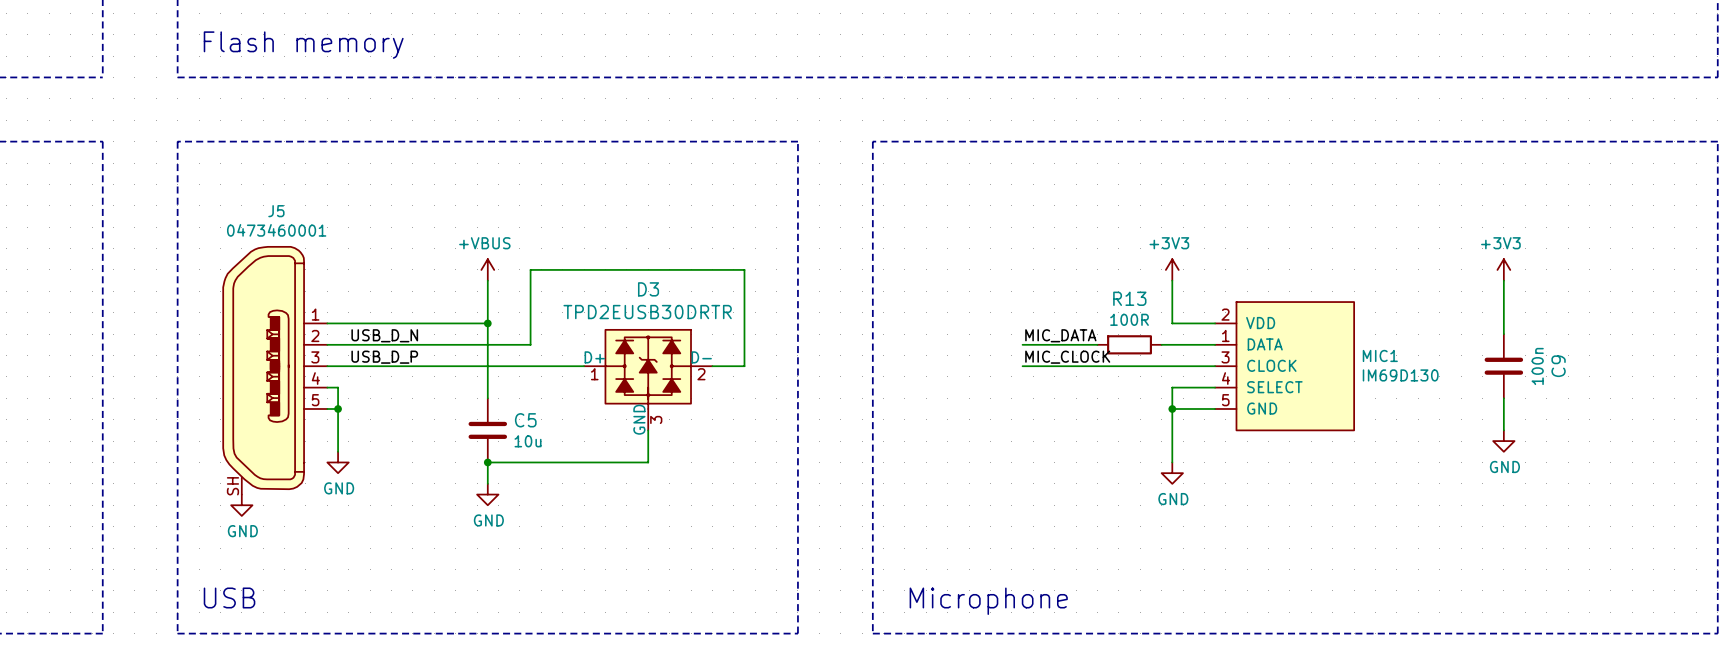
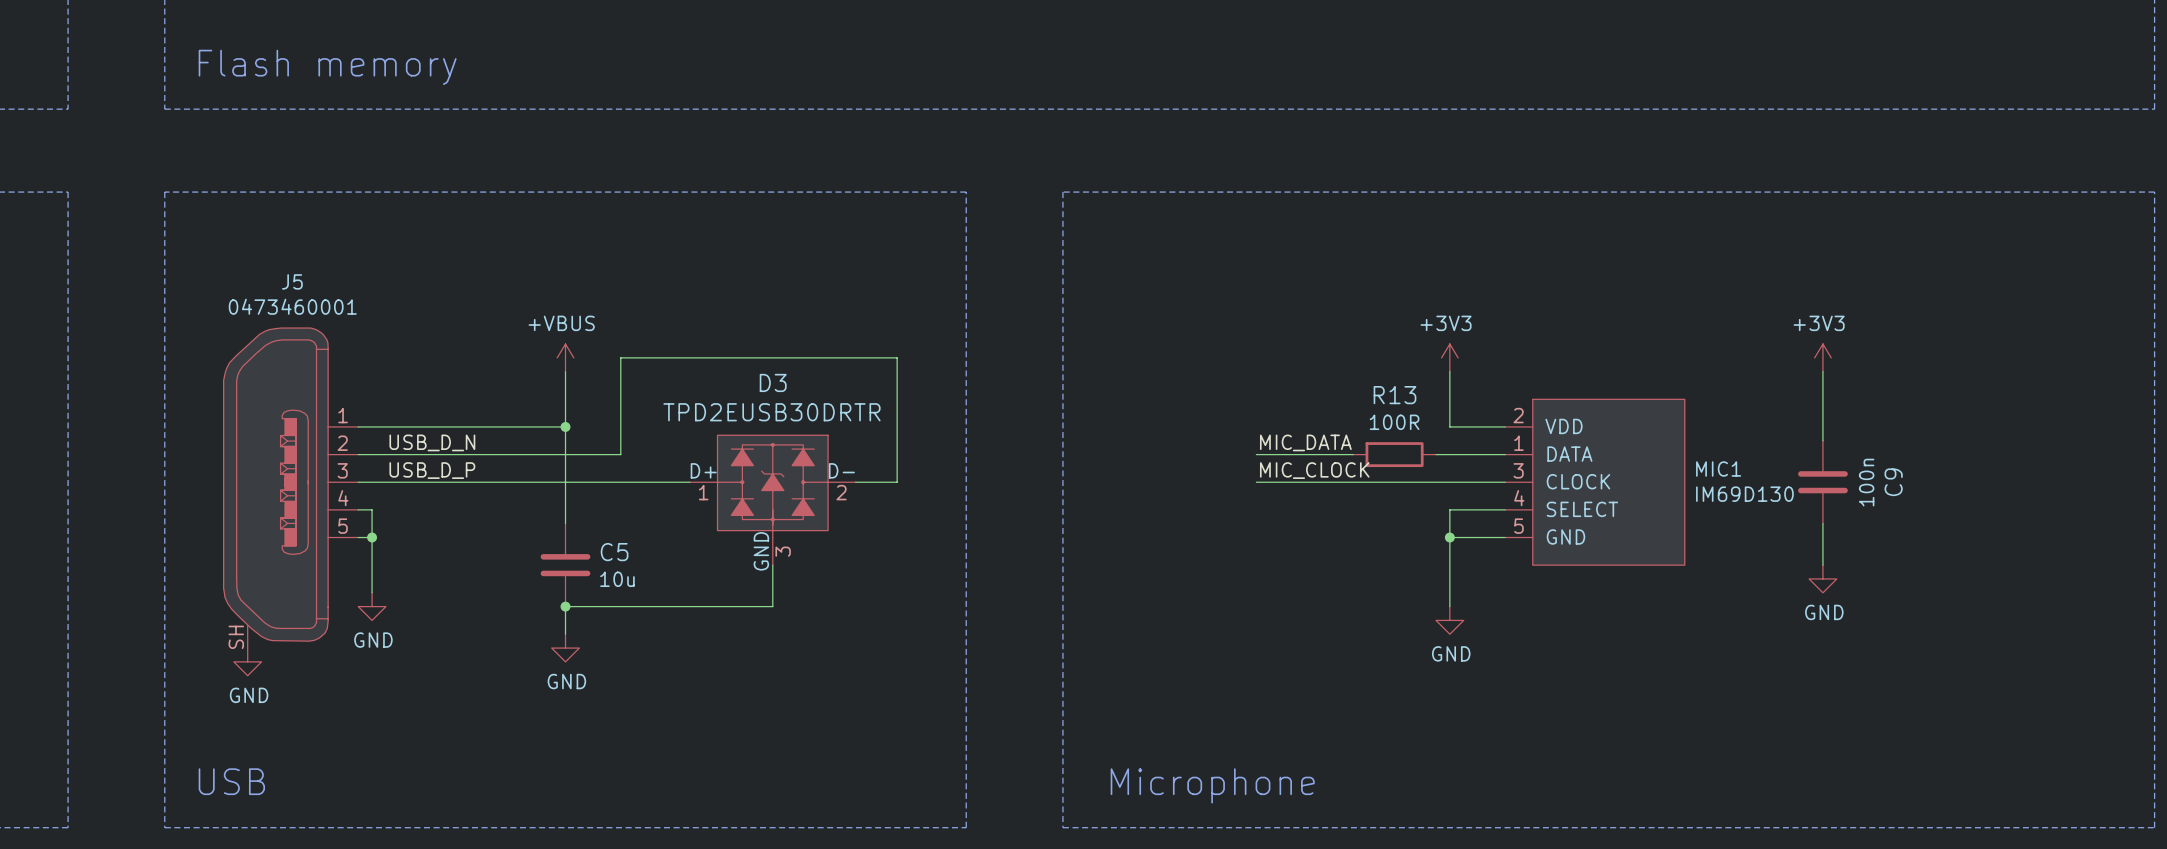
power symbol position: +3V3 (1503, 269) -> +3V3 (1822, 357)
wire: (1503, 280) (1503, 334) -> (1822, 371) (1822, 440)
C9 position: (1503, 366) -> (1822, 482)
wire: (1503, 398) (1503, 430) -> (1822, 523) (1822, 565)
power symbol position: GND (1503, 441) -> GND (1822, 578)

